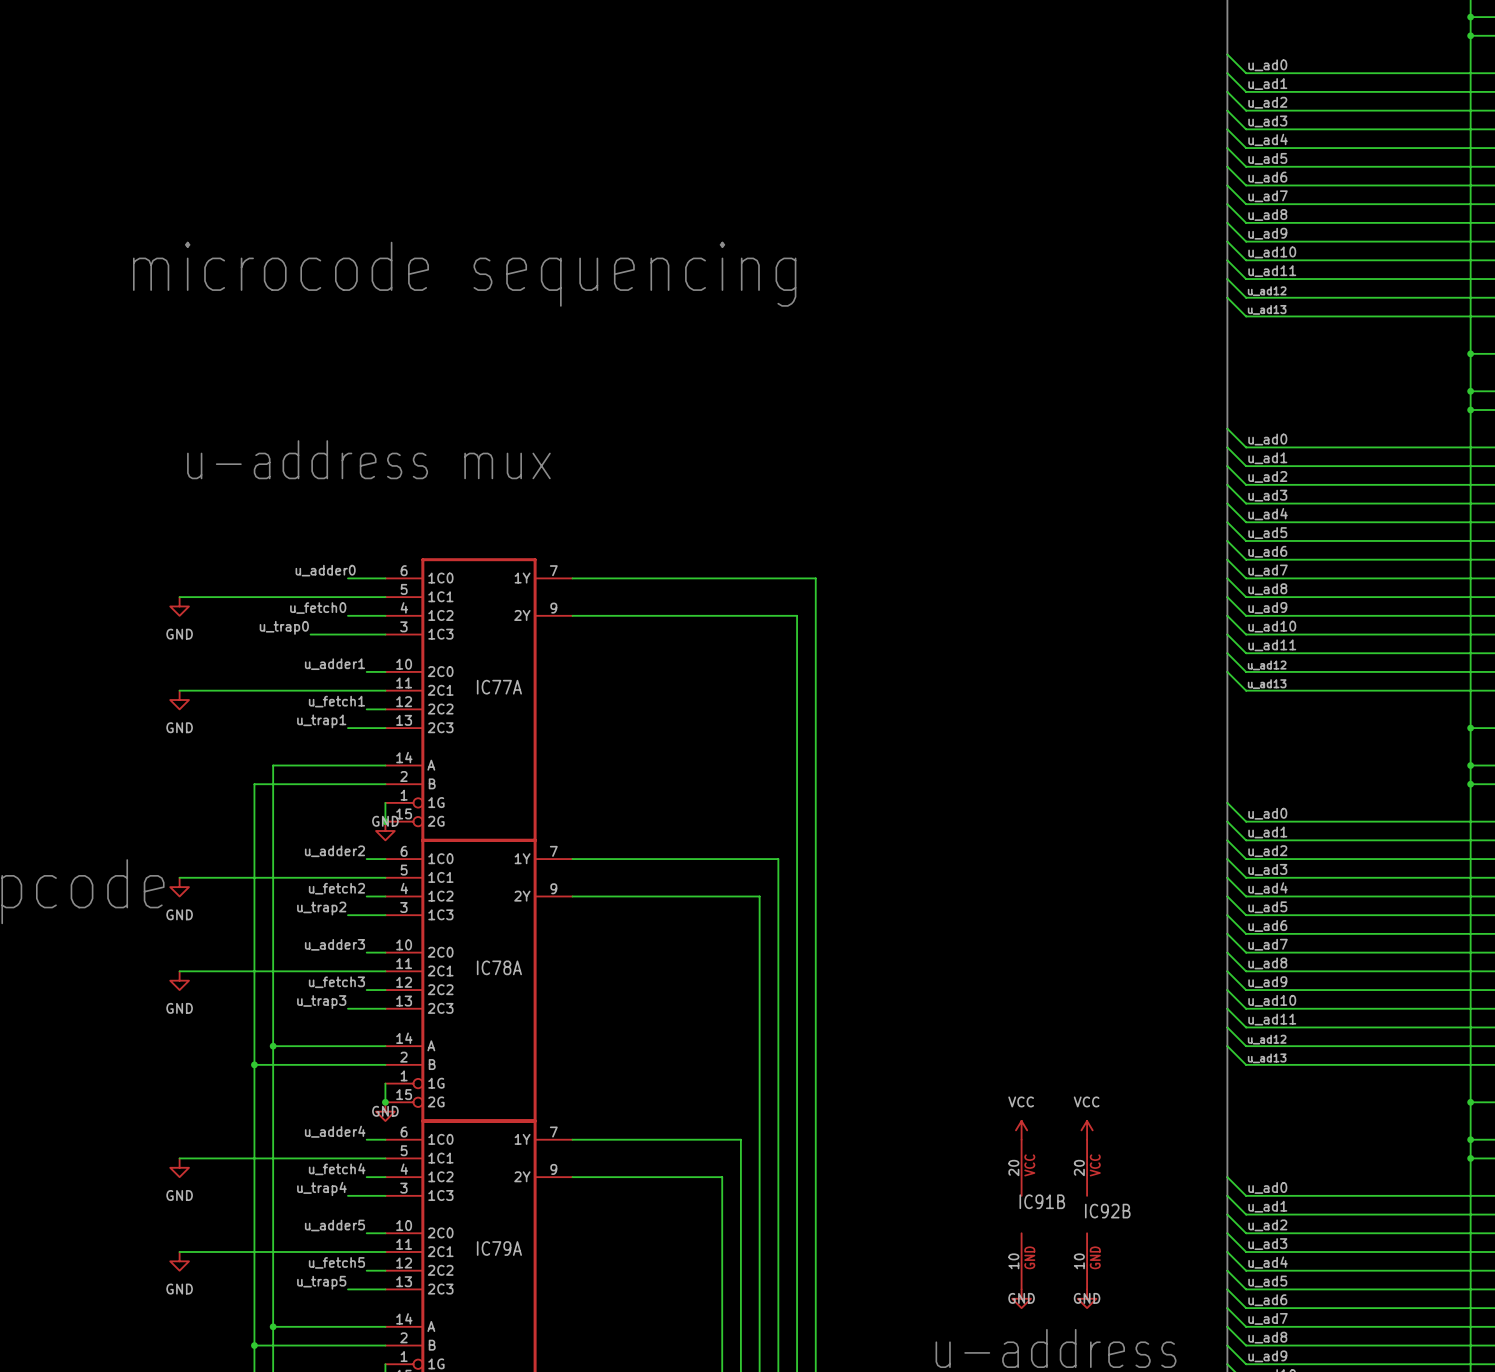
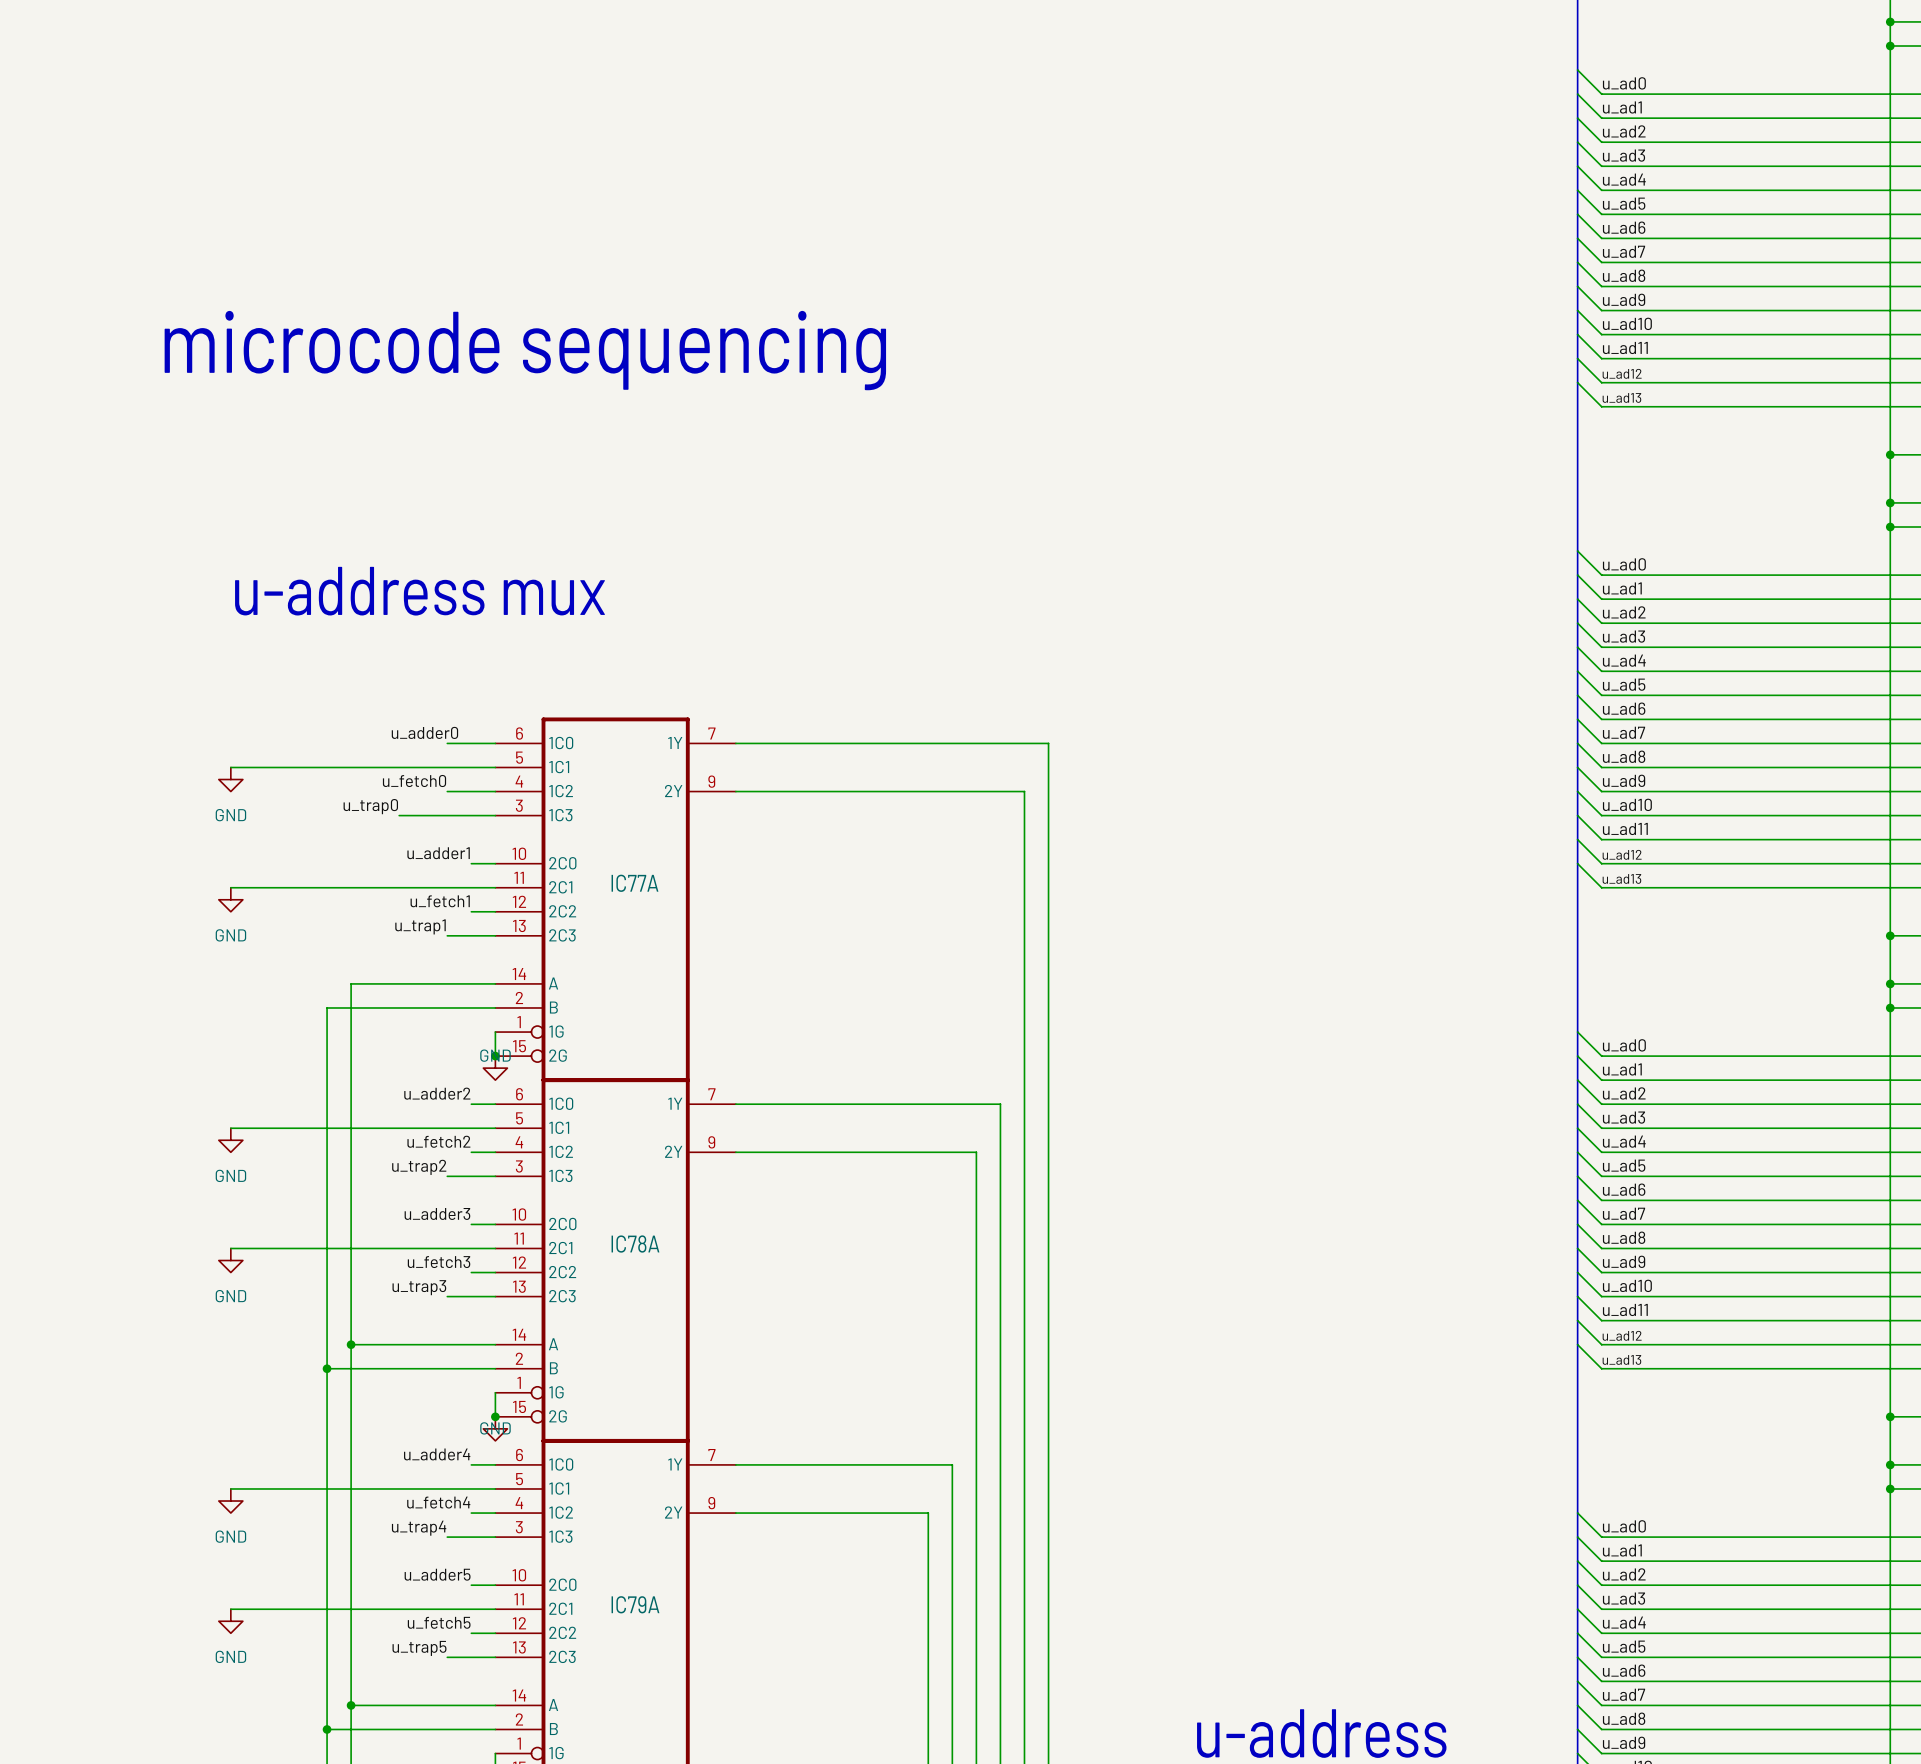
power symbol: VCC (1021, 1130) -> none
power symbol: VCC (1087, 1130) -> none
IC91B: (1021, 1214) -> none
IC92B: (1087, 1214) -> none
power symbol: GND (1021, 1298) -> none
power symbol: GND (1087, 1298) -> none

